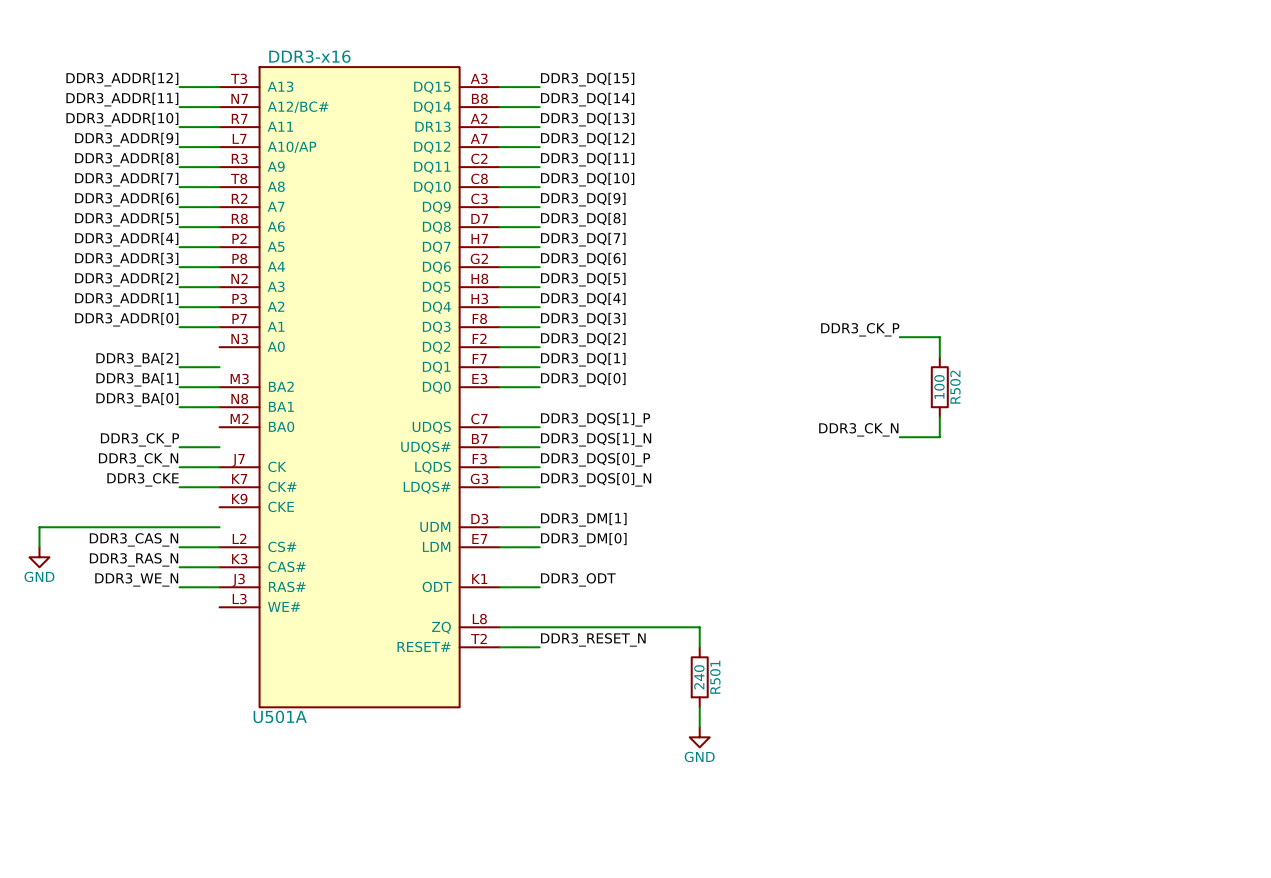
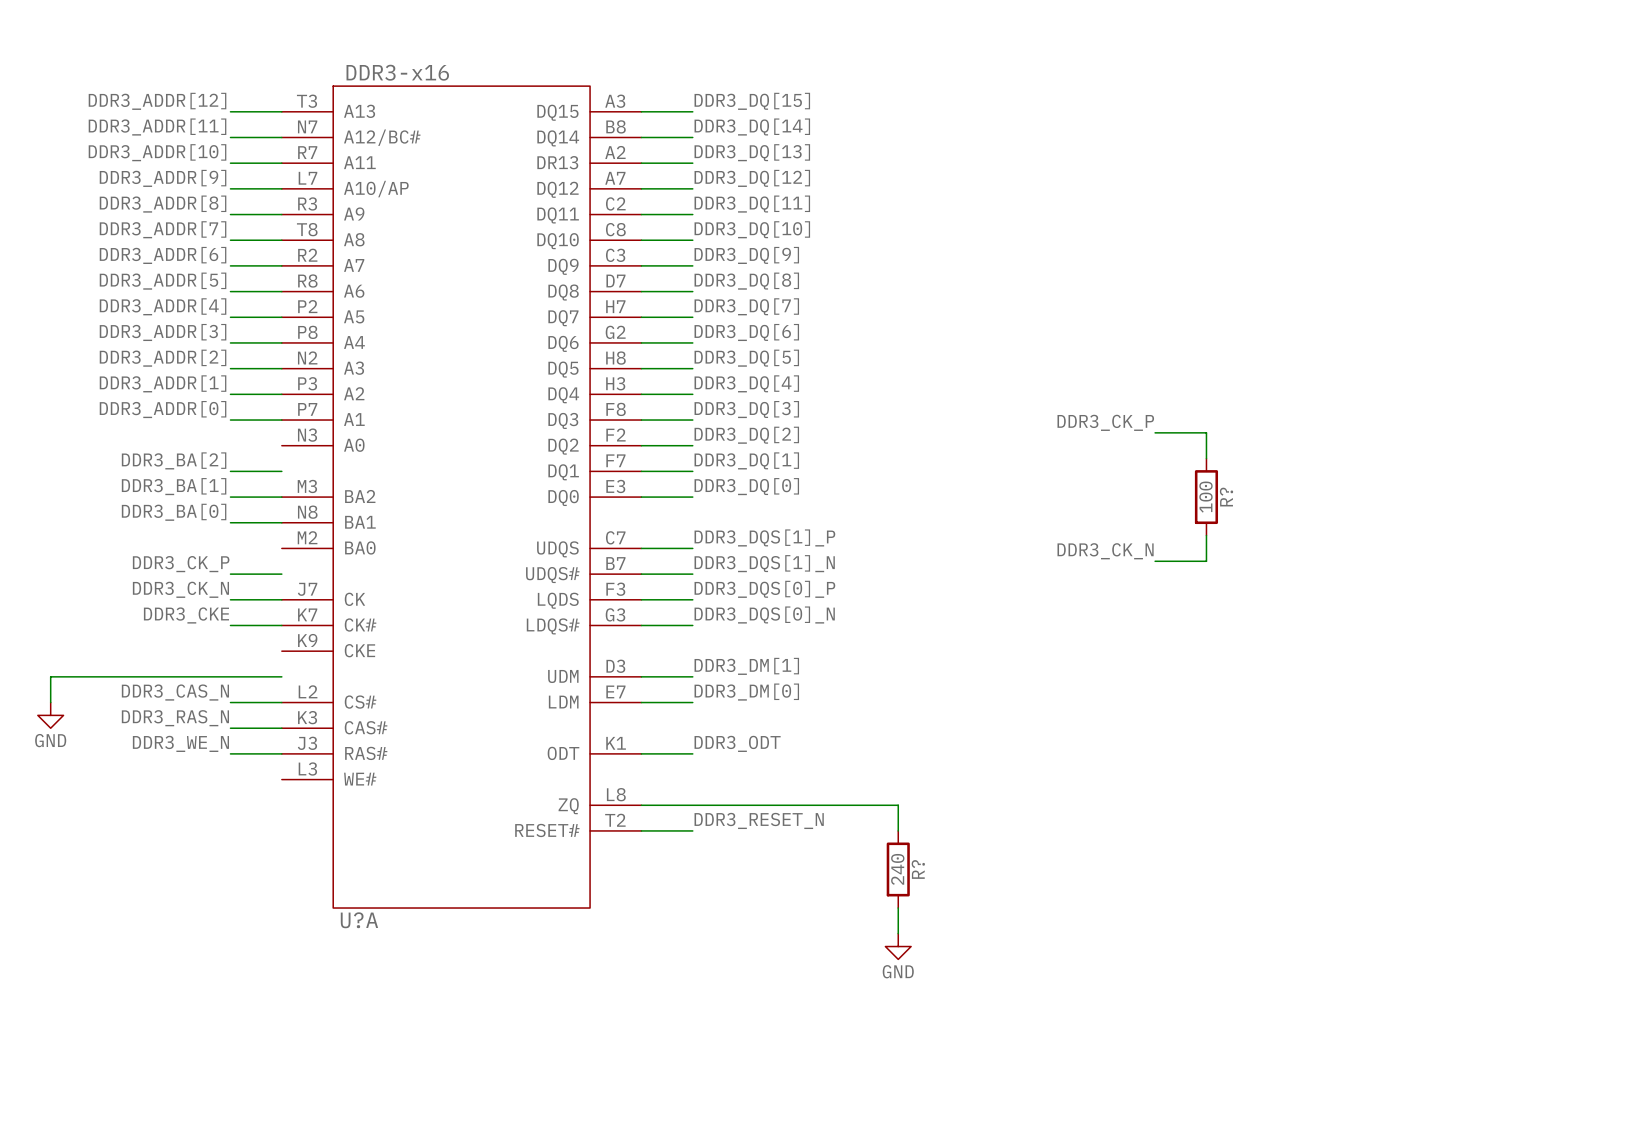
R502 name: R502 (955, 387) -> R? (1226, 497)
R501 name: R501 (715, 677) -> R? (918, 869)
U501A name: U501A (280, 716) -> U?A (359, 920)

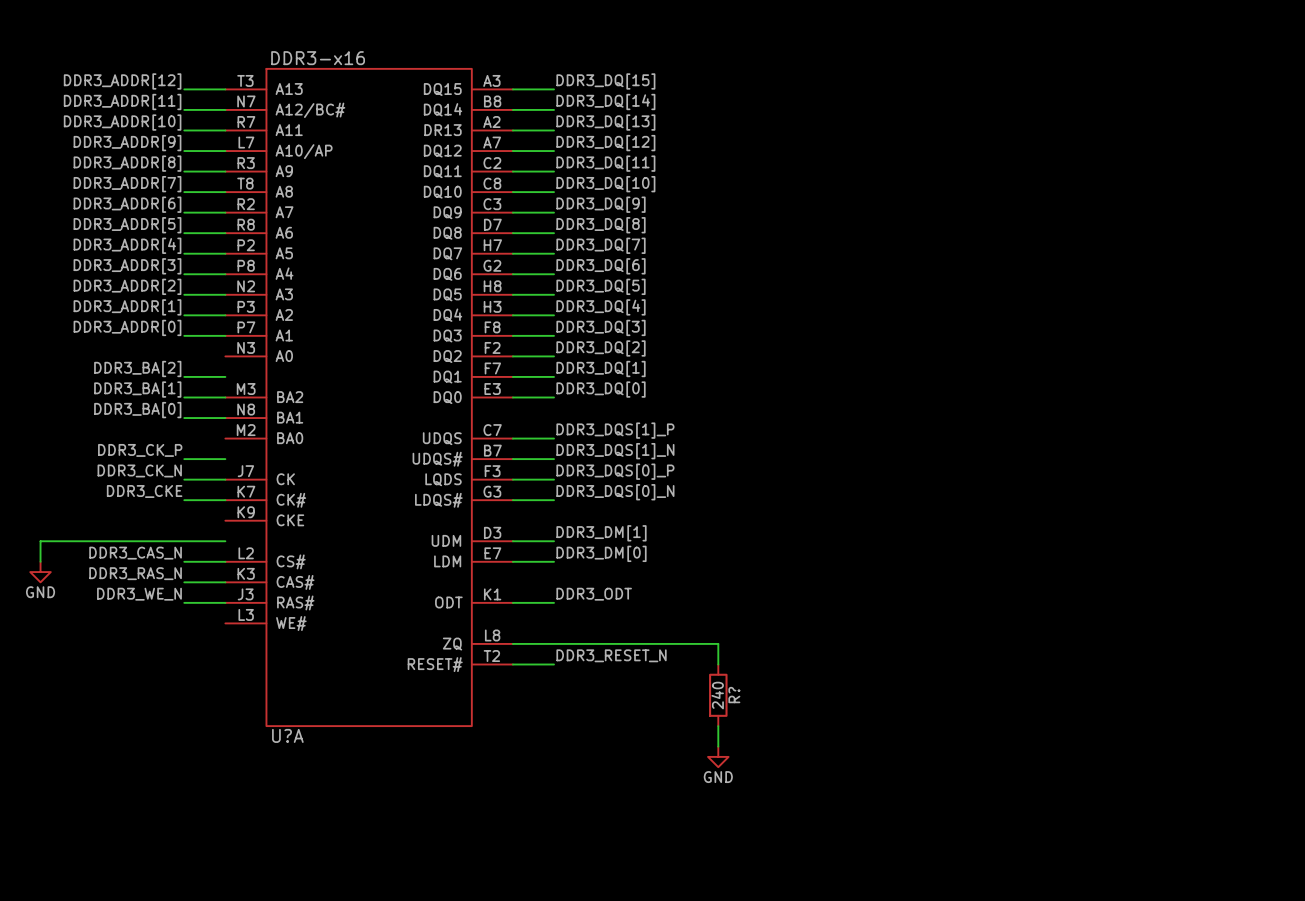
label: DDR3_CK_P (1105, 422) -> none
wire: (1155, 432) (1206, 432) (1206, 458) -> none
R?: 100 (1206, 497) -> none
wire: (1206, 535) (1206, 561) (1155, 561) -> none
label: DDR3_CK_N (1105, 551) -> none

